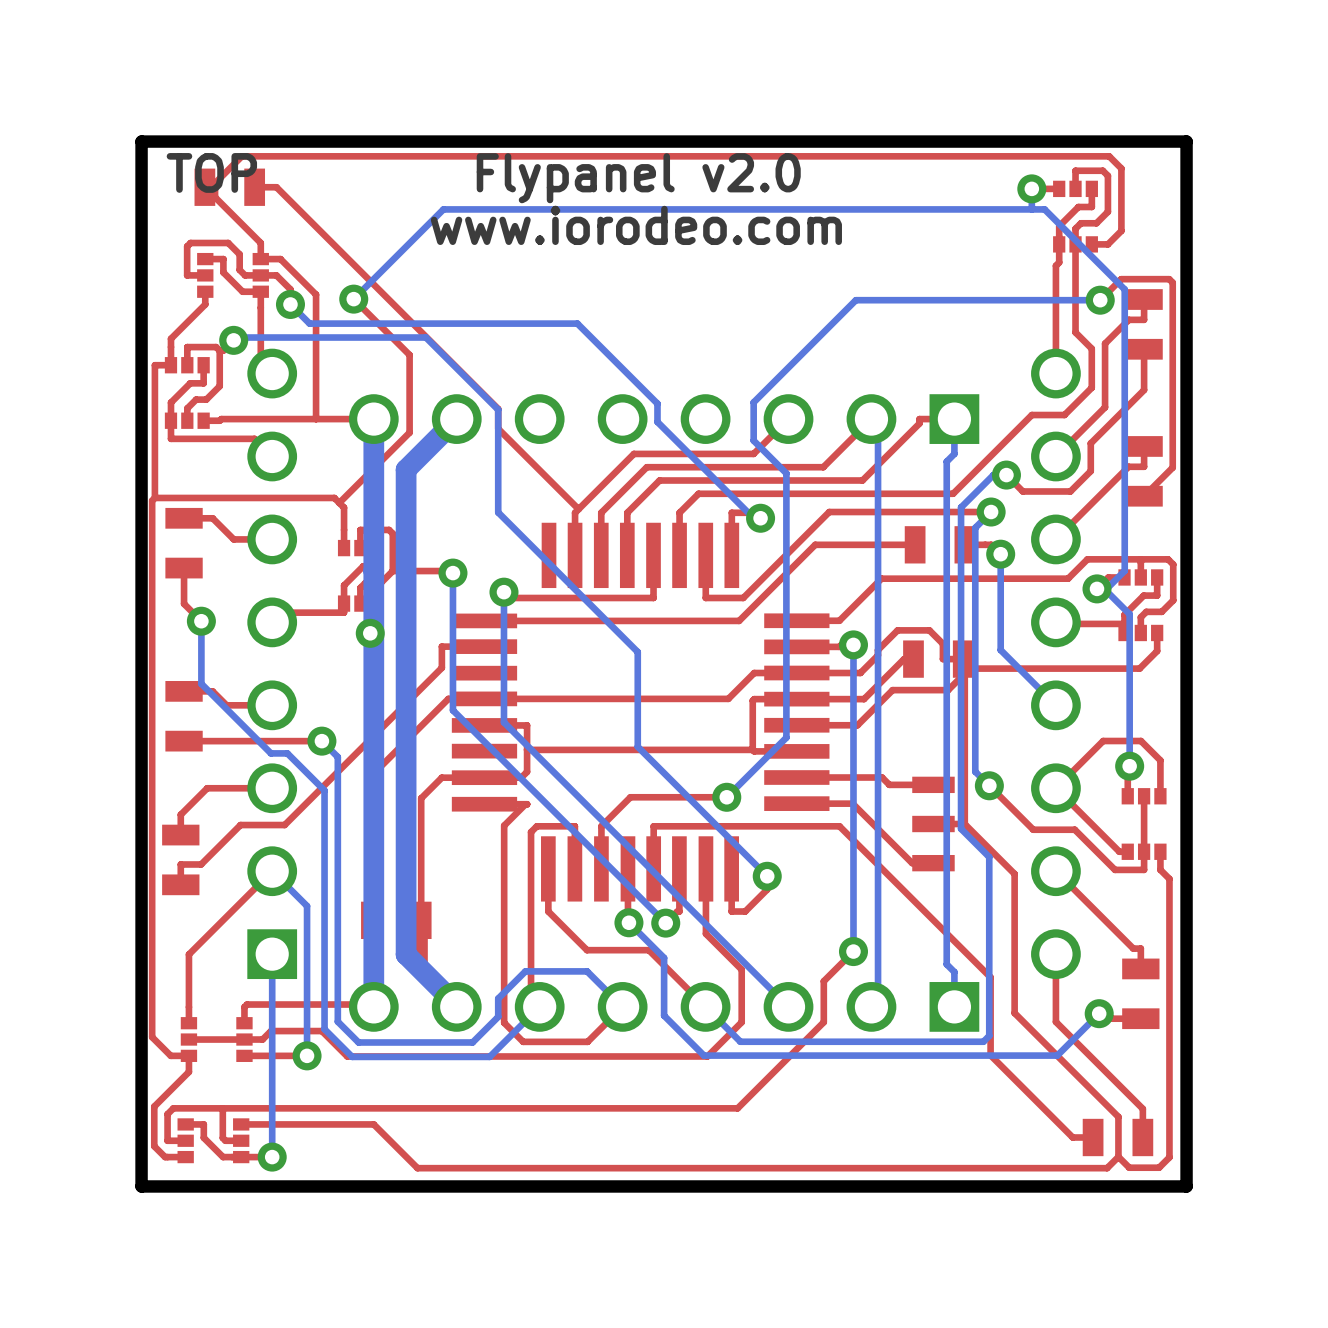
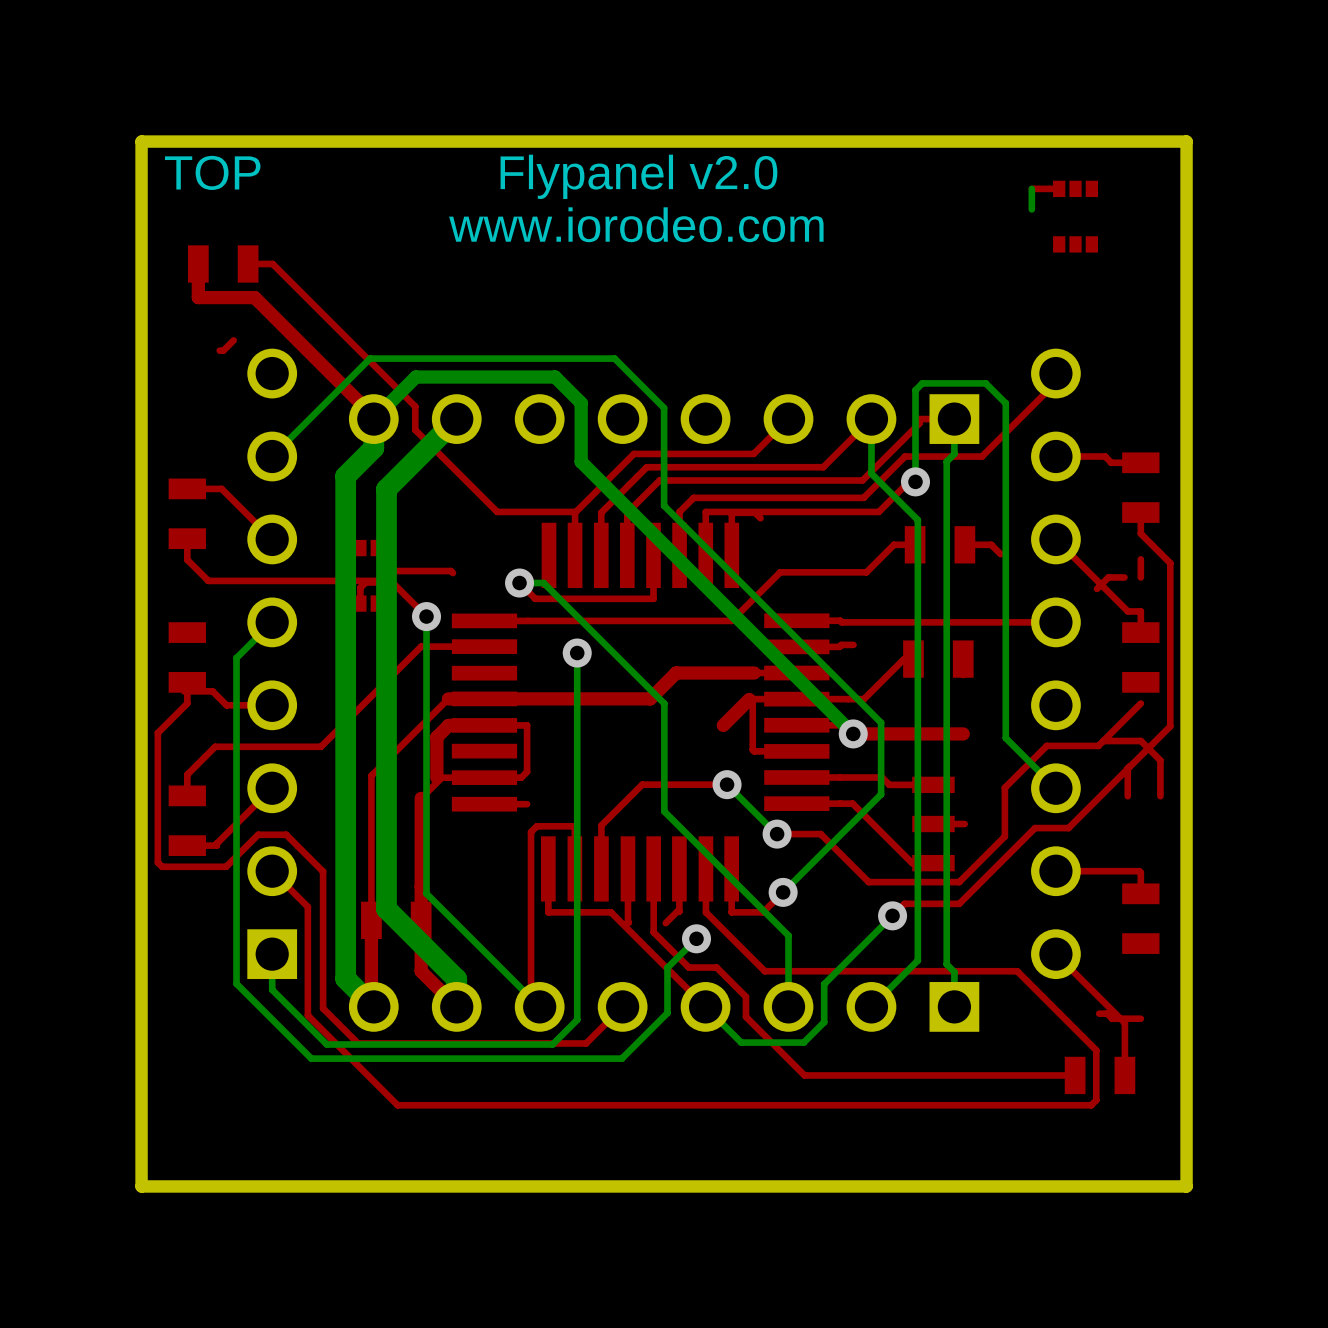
part: (229, 187) -> none
top track: (254, 187) (276, 187) (498, 408) (498, 428) (578, 509) -> none
via: (1031, 188) -> none
top track: (1075, 188) (1075, 170) (1102, 170) (1107, 175) (1107, 211) (1096, 223) (1080, 223) (1075, 228) (1075, 332) (1091, 348) (1091, 387) (1064, 415) (1031, 415) (953, 493) (698, 493) (679, 512) -> (1055, 373) (1055, 382) (981, 456) (905, 456) (863, 497) (693, 497) (679, 512)
top track: (1091, 188) (1091, 207) (1078, 207) (1059, 226) (1059, 262) (1055, 265) (1055, 373) -> none
top track: (1091, 244) (1107, 244) (1121, 230) (1121, 168) (1109, 156) (241, 156) (215, 183) (215, 197) (260, 243) (260, 259) (280, 259) (316, 294) (316, 419) -> none
part footprint: [197, 252, 269, 298] -> [187, 245, 259, 283]
top track: (205, 259) (223, 259) (223, 272) (242, 291) (260, 291) (260, 362) (272, 373) -> none
top track: none -> (248, 263) (272, 263) (415, 406) (415, 429) (497, 511) (575, 511)
top track: (205, 275) (187, 275) (187, 246) (190, 243) (228, 243) (239, 254) (239, 269) (245, 275) (276, 275) (290, 289) (290, 304) -> none
top track: (205, 291) (205, 304) (170, 338) (170, 365) (154, 365) (154, 497) -> none
top track: (353, 299) (409, 354) (409, 432) (339, 502) -> none
bottom track: (353, 299) (443, 209) (1044, 209) (1124, 289) (1124, 570) (1105, 590) -> none
via: (353, 299) -> none
top track: (1144, 299) (1144, 319) (1128, 319) (1105, 343) (1105, 407) (1055, 456) -> (1140, 462) (1111, 462) (1105, 456) (1055, 456)
top track: (1100, 300) (1121, 279) (1169, 279) (1172, 282) (1172, 467) (1144, 496) -> none
bottom track: (1100, 300) (855, 300) (753, 402) (753, 440) (786, 473) (786, 737) (726, 797) -> none
via: (1100, 300) -> none
bottom track: (290, 304) (309, 323) (577, 323) (657, 403) (657, 421) (753, 518) (760, 518) -> none
via: (290, 304) -> none
part: (1144, 324) -> none
bottom track: (233, 340) (236, 337) (425, 337) (498, 409) (498, 512) (637, 652) (637, 746) (767, 876) -> none
via: (233, 340) -> none
top track: (1144, 349) (1144, 390) (1090, 443) (1090, 471) (1070, 491) (1022, 491) (1006, 475) -> none
top track: (187, 365) (187, 347) (216, 347) (219, 350) (219, 386) (206, 399) (196, 399) (187, 408) (187, 420) -> none
top track: (203, 365) (203, 383) (190, 383) (170, 402) (170, 438) (254, 438) (272, 456) -> none
part: (187, 392) -> none
top track: (373, 419) (203, 420) -> (373, 419) (373, 416) (254, 297) (198, 297) (198, 263)
bottom track: none -> (373, 419) (415, 377) (555, 377) (581, 403) (581, 461) (853, 733)
bottom track: (456, 419) (406, 469) (406, 954) (456, 1005) -> (456, 419) (386, 489) (386, 908) (456, 979) (456, 1005)
bottom track: (871, 419) (878, 425) (878, 1000) -> (871, 419) (871, 473) (917, 520) (917, 960) (878, 1000)
top track: (1144, 446) (1144, 466) (1128, 466) (1055, 539) -> (1140, 617) (1140, 611) (1127, 611) (1055, 539)
bottom track: (373, 448) (373, 1006) -> (373, 448) (345, 476) (345, 978) (373, 1006)
bottom track: none -> (272, 456) (370, 358) (614, 358) (664, 407) (664, 505) (881, 722) (881, 794) (783, 892)
part position: (1144, 471) -> (1140, 487)
bottom track: (1006, 475) (993, 475) (961, 507) (961, 828) (989, 857) (989, 1035) (983, 1041) (740, 1041) -> (892, 915) (824, 984) (824, 1022) (803, 1042) (740, 1041)
via: (1006, 475) -> none
bottom track: none -> (915, 481) (915, 390) (922, 383) (985, 383) (1005, 403) (1005, 738) (1055, 788)
via: none -> (915, 481)
top track: (154, 497) (152, 500) (152, 1037) (170, 1055) (188, 1055) (188, 1071) (154, 1106) (154, 1146) (165, 1157) (185, 1157) -> none
top track: (154, 497) (334, 497) (344, 507) (344, 548) -> none
top track: (991, 512) (829, 512) (743, 597) (705, 597) (705, 555) -> (915, 481) (908, 481) (878, 511) (705, 511) (705, 555)
bottom track: (991, 512) (975, 527) (975, 771) (989, 785) -> none
via: (991, 512) -> none
top track: none -> (1140, 512) (1140, 533) (1170, 563) (1170, 726) (1068, 828) (1035, 828) (959, 903) (904, 903) (892, 915)
top track: (184, 518) (212, 518) (233, 539) (272, 539) -> (187, 488) (221, 488) (272, 539)
via: (760, 518) -> none
top track: none -> (187, 538) (187, 559) (208, 580) (390, 580) (426, 616)
part position: (184, 543) -> (187, 513)
top track: (893, 544) (815, 544) (739, 620) (731, 620) -> (893, 544) (866, 572) (780, 572) (731, 620)
top track: (360, 548) (360, 529) (389, 529) (392, 533) (392, 571) -> none
top track: (376, 548) (376, 566) (363, 566) (344, 585) (344, 612) (281, 612) (272, 622) -> none
bottom track: (1000, 554) (1000, 650) (1055, 705) -> none
via: (1000, 554) -> none
top track: (184, 568) (184, 603) (201, 621) -> none
bottom track: (452, 573) (452, 710) (665, 923) -> none
via: (452, 573) -> none
top track: (1157, 577) (1157, 595) (1143, 595) (1124, 614) (1124, 632) -> none
via: (1097, 588) -> none
bottom track: (1105, 590) (1129, 614) (1129, 766) -> none
top track: (503, 592) (509, 597) (653, 597) -> (519, 583) (535, 598) (653, 597)
bottom track: (503, 592) (503, 722) (788, 1006) -> (519, 583) (543, 583) (664, 703) (664, 811) (788, 935) (788, 1006)
via position: (503, 592) -> (519, 583)
part: (1140, 605) -> none
via: none -> (426, 616)
top track: (1140, 617) (1146, 611) (1161, 611) (1173, 600) (1173, 564) (1168, 559) (1087, 559) (1068, 578) (881, 578) (839, 620) -> (1055, 622) (841, 622) (839, 620)
bottom track: (201, 621) (201, 683) (270, 753) (287, 753) (324, 790) (324, 1029) (352, 1056) (489, 1056) (539, 1006) -> (426, 616) (426, 893) (539, 1006)
via: (201, 621) -> none
bottom track: none -> (272, 622) (236, 658) (236, 983) (311, 1058) (621, 1058) (667, 1013) (667, 967) (696, 938)
top track: (1055, 622) (1057, 623) (1124, 623) -> none
top track: (1157, 632) (1157, 651) (1139, 668) (964, 668) (964, 823) (1014, 873) (1014, 1013) (1118, 1116) (1118, 1156) -> none
via: (370, 633) -> none
bottom track: (853, 644) (853, 951) -> none
via: (853, 644) -> none
top track: (441, 646) (441, 667) (284, 825) (240, 825) (201, 864) (180, 864) (180, 884) -> (441, 646) (421, 646) (320, 746) (215, 746) (187, 774) (187, 795)
via: none -> (577, 653)
part: none -> (187, 657)
part: none -> (1140, 657)
top track: (963, 659) (942, 659) (942, 643) (929, 630) (897, 630) (877, 650) (877, 655) (860, 673) (796, 673) -> none
top track: (754, 673) (728, 698) (650, 698) -> (754, 673) (676, 673) (650, 698)
top track: (963, 675) (948, 690) (892, 690) (857, 725) (844, 725) -> (963, 733) (853, 733) (844, 725)
top track width: thin (650, 698) (448, 698) -> thick (650, 698) (448, 698)
top track: none -> (749, 699) (723, 725)
part: (184, 716) -> none
top track: none -> (484, 725) (448, 725) (436, 737) (436, 777)
via: none -> (853, 733)
top track: (321, 741) (184, 741) -> none
bottom track: (321, 741) (337, 757) (337, 1021) (358, 1042) (472, 1042) (498, 1016) (498, 998) (525, 971) (587, 971) (622, 1006) -> none
via: (321, 741) -> none
top track: (1098, 745) (1055, 788) (1119, 851) (1127, 851) -> (1098, 745) (1046, 745) (1004, 787) (1004, 836) (959, 882) (868, 882) (820, 834) (777, 834)
top track: (752, 749) (527, 749) -> none
via: (1129, 766) -> none
bottom track: none -> (727, 784) (776, 834)
top track: (989, 785) (1033, 829) (1074, 829) (1115, 869) (1144, 869) (1144, 796) -> none
via: (989, 785) -> none
top track: (272, 788) (207, 788) (180, 814) (180, 835) -> (272, 788) (216, 845) (187, 845)
top track: (726, 797) (630, 797) (601, 826) -> (727, 784) (642, 784) (601, 826)
via position: (726, 797) -> (727, 784)
top track width: thin (421, 798) (421, 920) -> thick (421, 798) (421, 920)
top track: (526, 804) (504, 825) (504, 1022) (523, 1041) (587, 1041) -> (187, 682) (187, 703) (157, 732) (157, 862) (162, 866) (226, 866) (258, 834) (286, 834) (323, 871) (323, 1008) (358, 1043) (586, 1043) (587, 1041)
part: (1144, 824) -> none
via: none -> (777, 834)
top track: (1160, 851) (1160, 869) (1169, 878) (1169, 1157) (1159, 1167) (1129, 1167) (1118, 1156) -> none
part position: (180, 859) -> (187, 820)
top track: (653, 868) (653, 826) (839, 826) (990, 977) (990, 1055) (1072, 1137) (1093, 1137) -> (653, 868) (653, 932) (688, 967) (716, 967) (745, 996) (745, 1016) (804, 1075) (1075, 1075)
top track: (272, 871) (188, 954) (188, 1023) -> none
bottom track: (272, 871) (307, 906) (307, 1055) -> none
top track: (1055, 871) (1133, 948) (1140, 948) (1140, 968) -> (1055, 871) (1139, 871) (1140, 893)
top track: (767, 876) (767, 889) (745, 911) (731, 911) -> (783, 892) (763, 912) (731, 911)
via position: (767, 876) -> (783, 892)
top track: (548, 911) (586, 950) (648, 950) -> (548, 911) (611, 912) (648, 950)
top track: (705, 912) (705, 933) (741, 969) (741, 1022) (707, 1056) (347, 1056) (321, 1031) (271, 1031) (262, 1039) (188, 1039) -> (705, 912) (764, 971) (1017, 971) (1096, 1050) (1096, 1100) (1091, 1105) (397, 1105) (307, 1015) (307, 906) (272, 871)
via: none -> (892, 915)
part: none -> (1140, 918)
bottom track: (628, 922) (664, 957) (664, 1015) (704, 1055) (1057, 1055) (1099, 1013) -> none
via: (628, 922) -> none
via: (665, 923) -> none
via: none -> (696, 938)
top track: (853, 951) (823, 981) (823, 1022) (737, 1108) (173, 1108) (167, 1114) (167, 1140) (185, 1140) -> none
via: (853, 951) -> none
top track: (1055, 954) (1055, 1021) (1142, 1108) (1142, 1137) -> (1055, 954) (1124, 1023) (1124, 1075)
bottom track: (272, 989) (272, 1157) -> (272, 989) (326, 1044) (552, 1044) (577, 1019) (577, 653)
part: (1140, 993) -> none
top track: (371, 1004) (247, 1004) (244, 1007) (244, 1023) -> none
via: (1099, 1013) -> none
part: (216, 1039) -> none
top track: (307, 1055) (244, 1055) -> none
via: (307, 1055) -> none
part: none -> (1100, 1075)
top track: (222, 1108) (222, 1138) (225, 1140) (241, 1140) -> none
top track: (185, 1124) (203, 1124) (203, 1137) (223, 1157) (272, 1157) -> none
top track: (241, 1124) (373, 1124) (417, 1168) (1107, 1168) (1118, 1156) -> none
part: (1117, 1137) -> none
part: (213, 1140) -> none
via: (272, 1157) -> none

